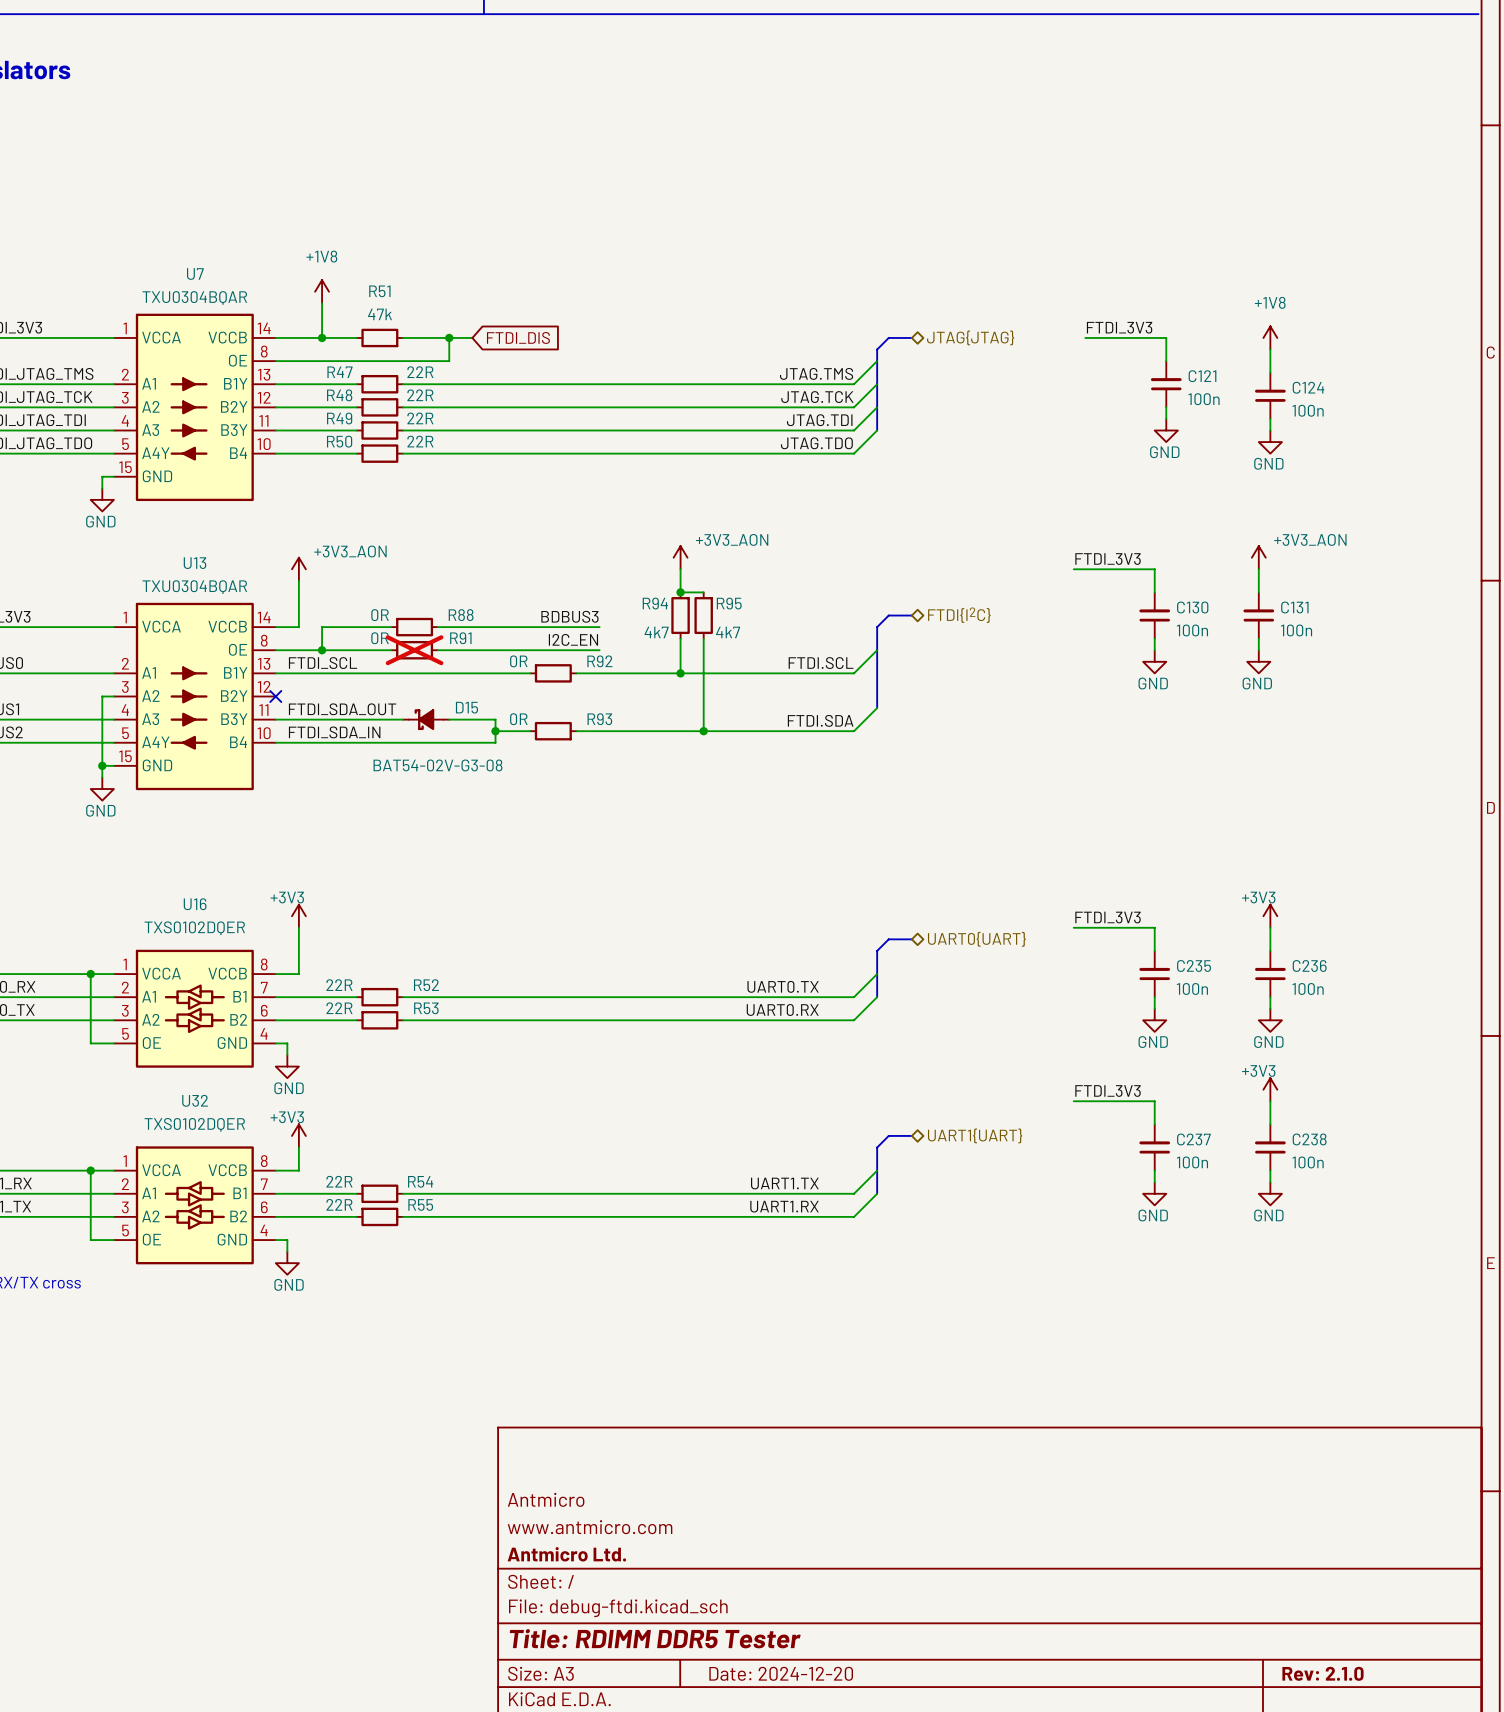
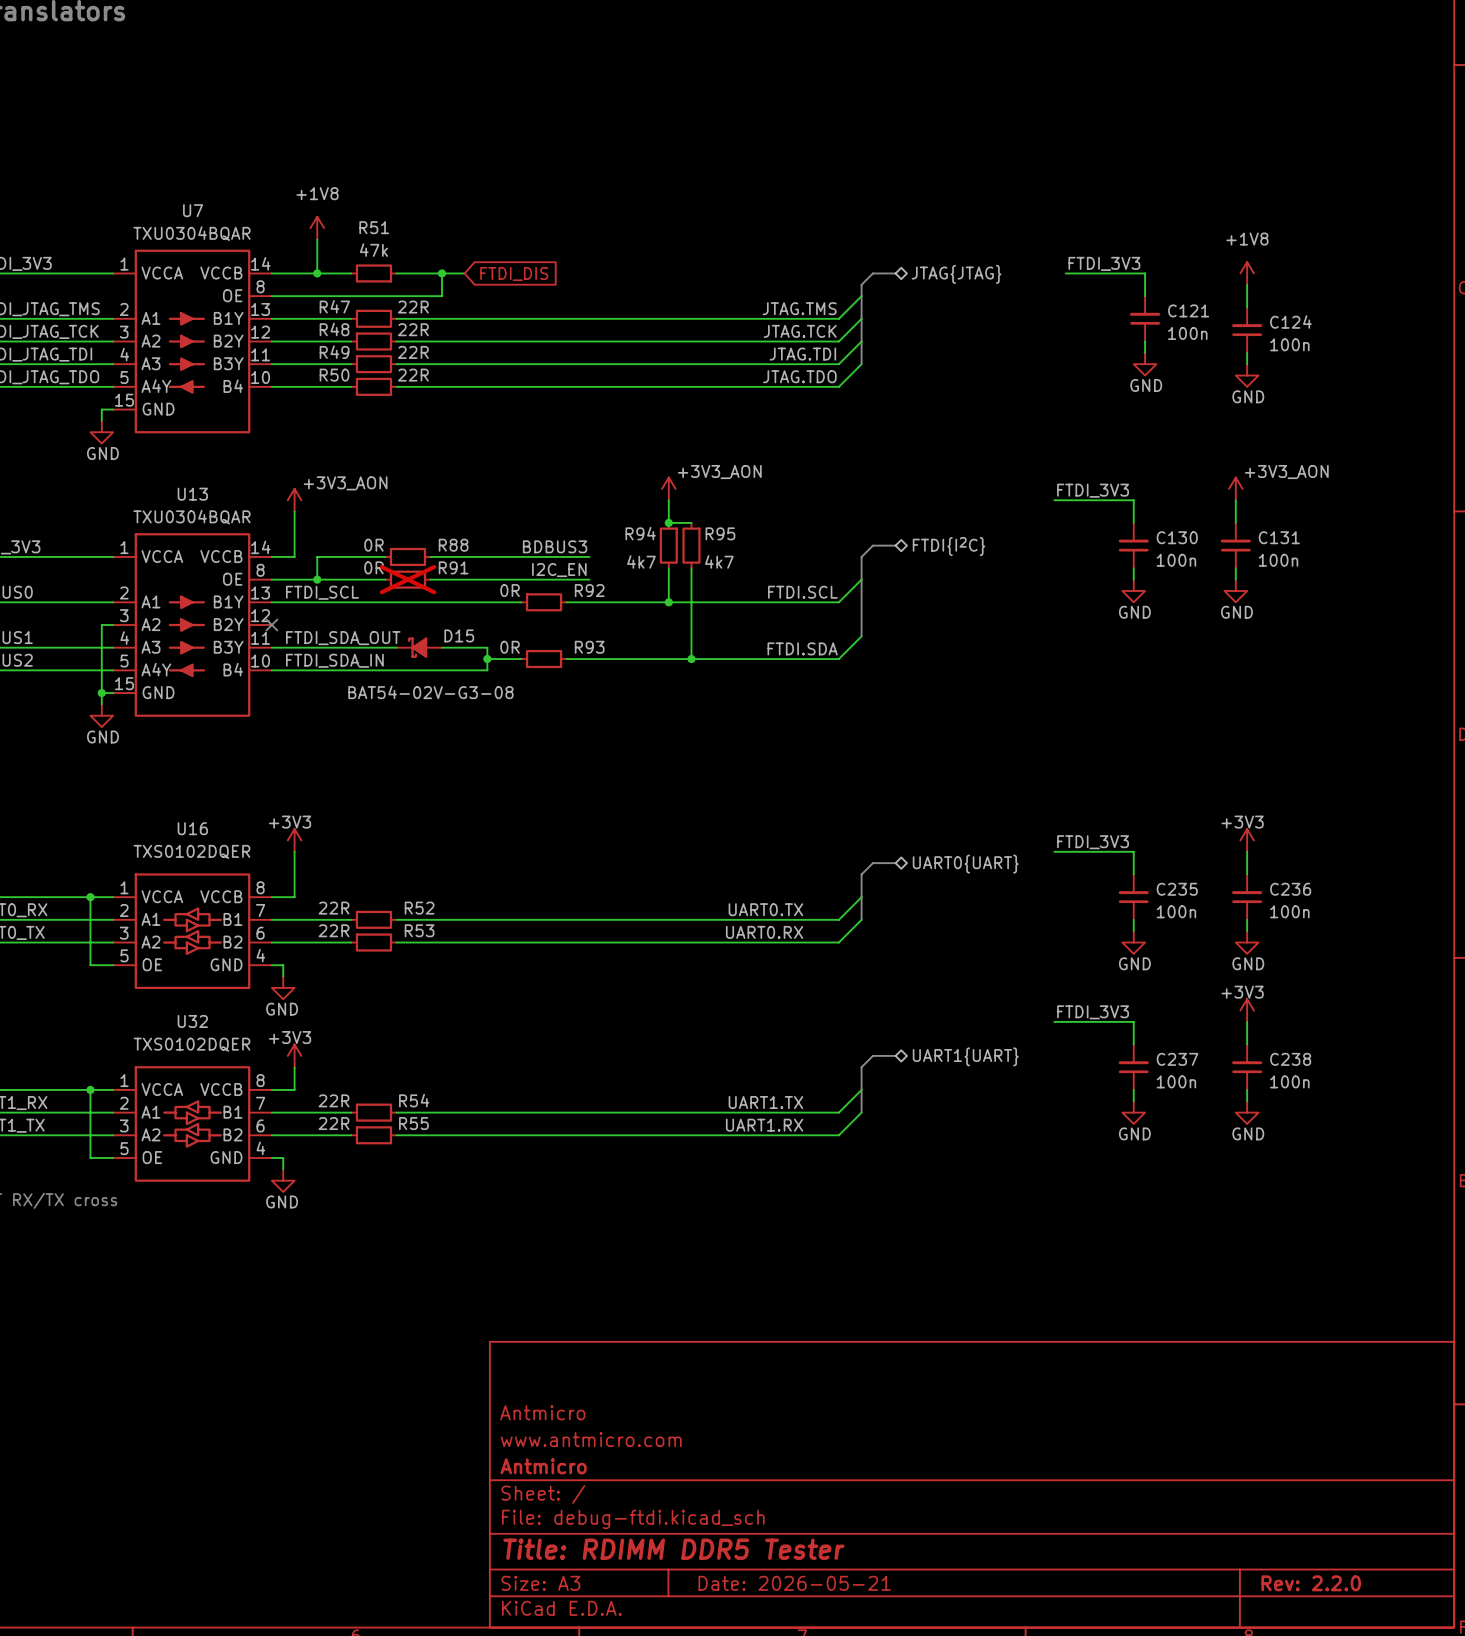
title block: Antmicro Ltd. (566, 1554) -> Antmicro (543, 1466)
title block: Date: 2024-12-20 (781, 1673) -> Date: 2026-05-21 (794, 1583)
title block: Rev: 2.1.0 (1322, 1673) -> Rev: 2.2.0 (1311, 1583)

